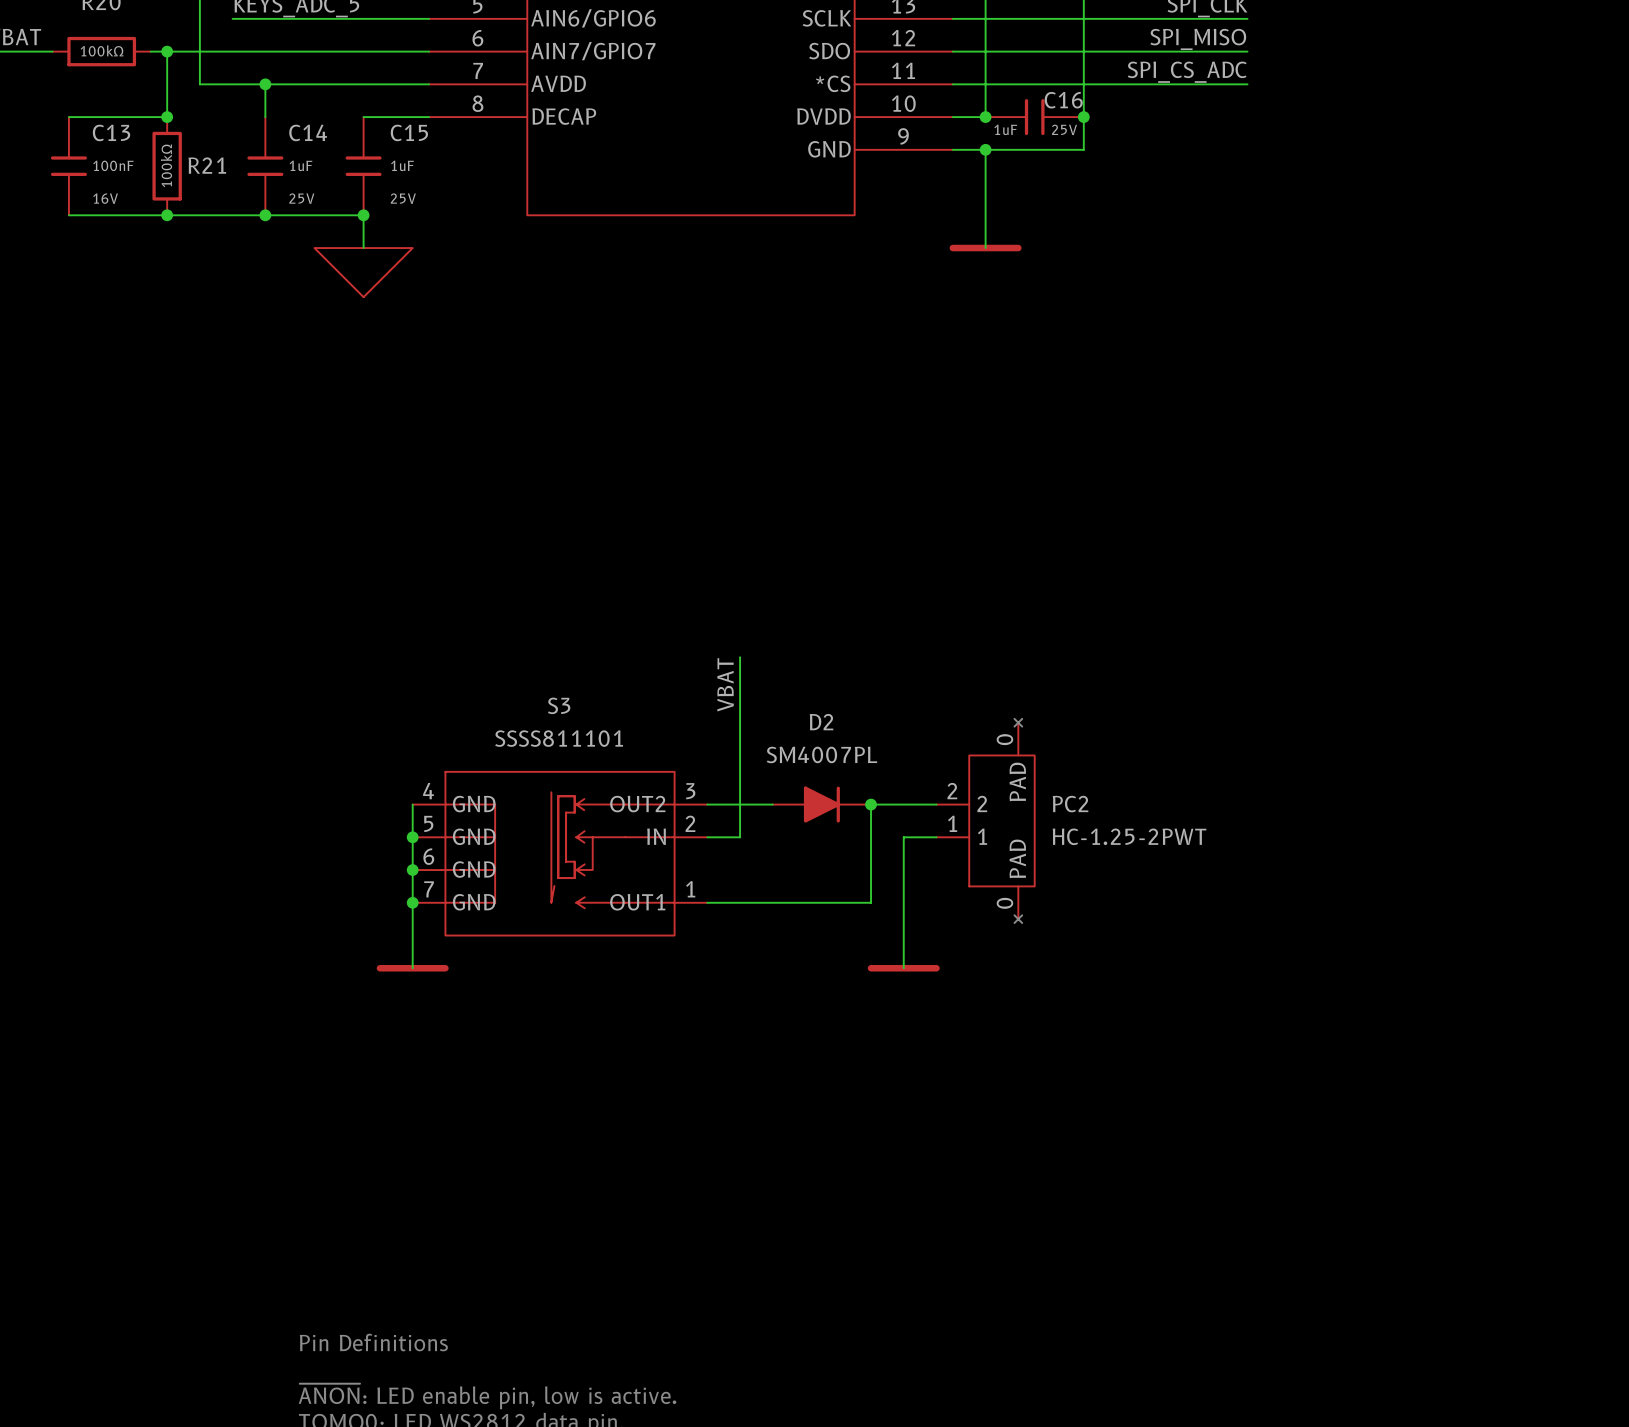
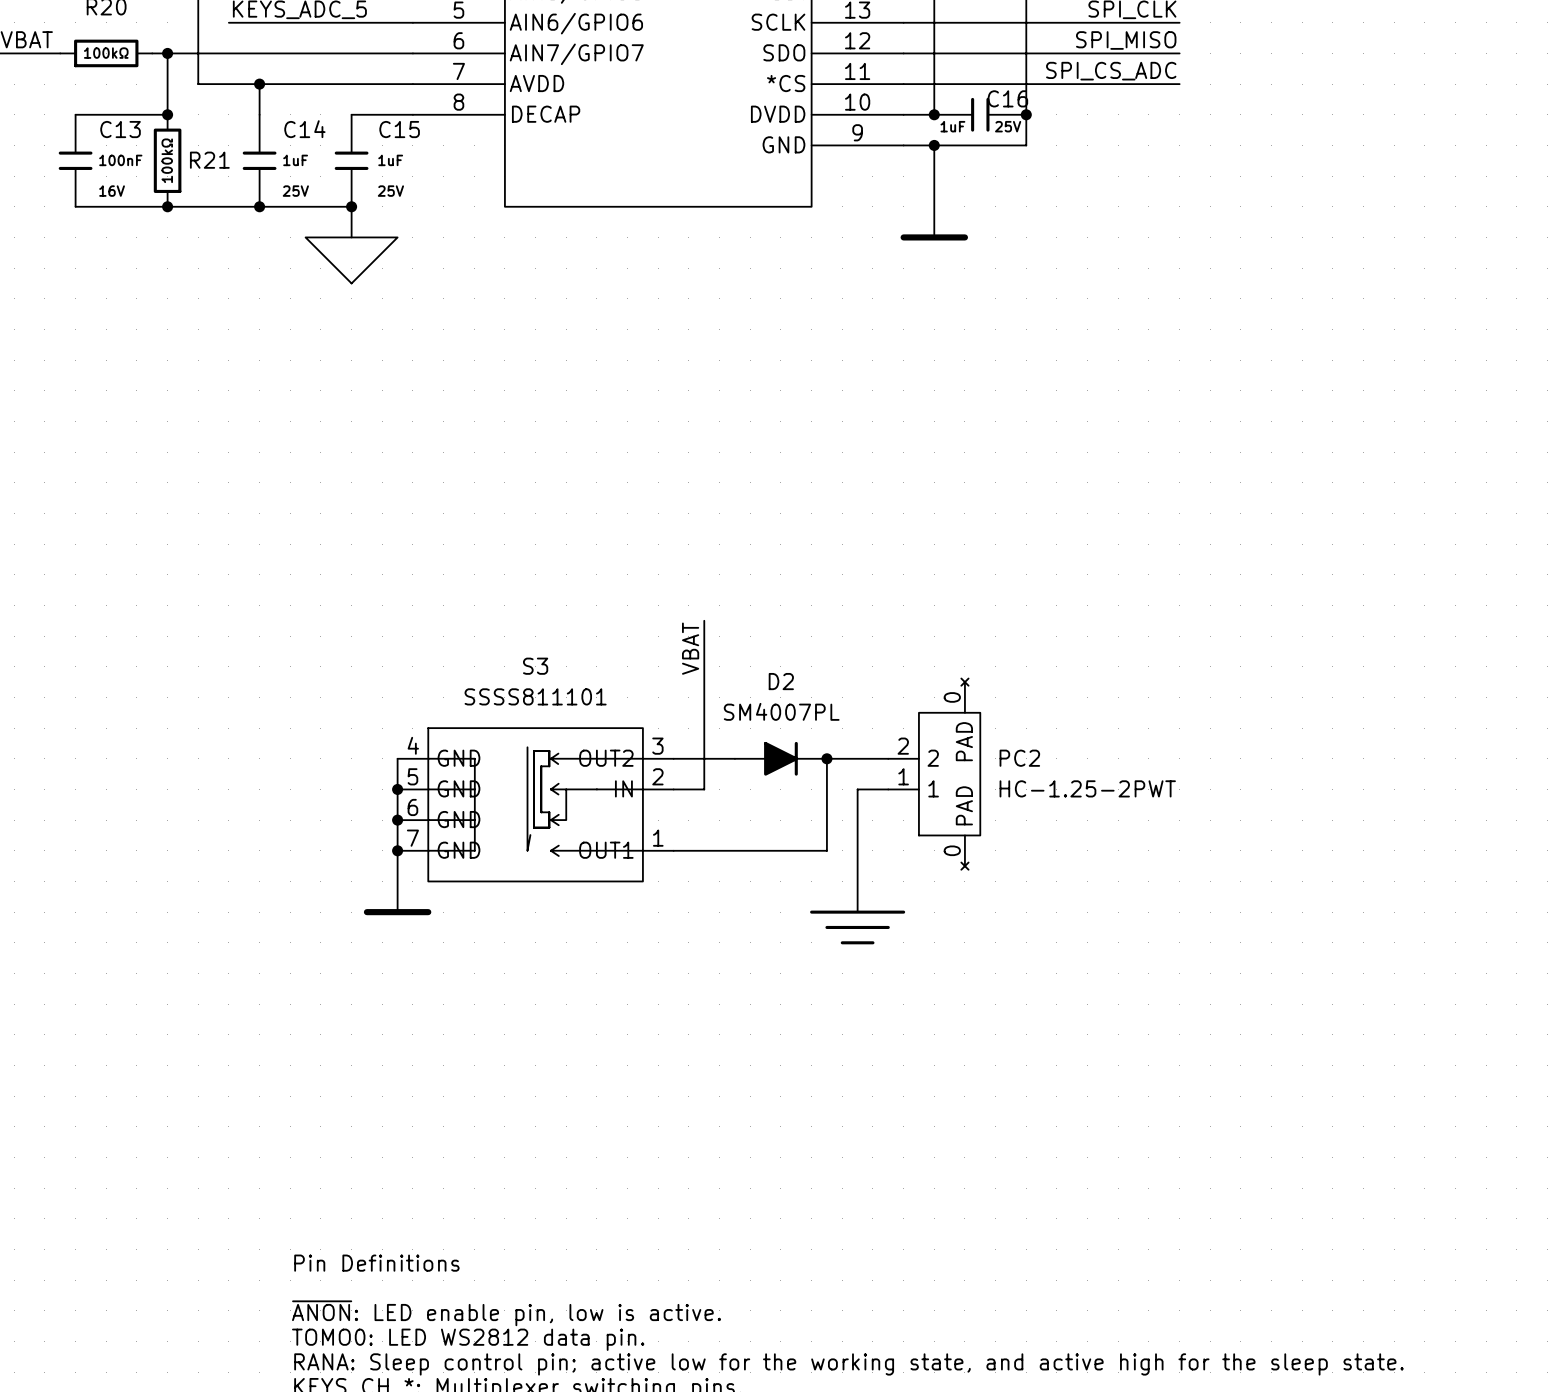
power symbol: (903, 968) -> none
power symbol: none -> (857, 927)

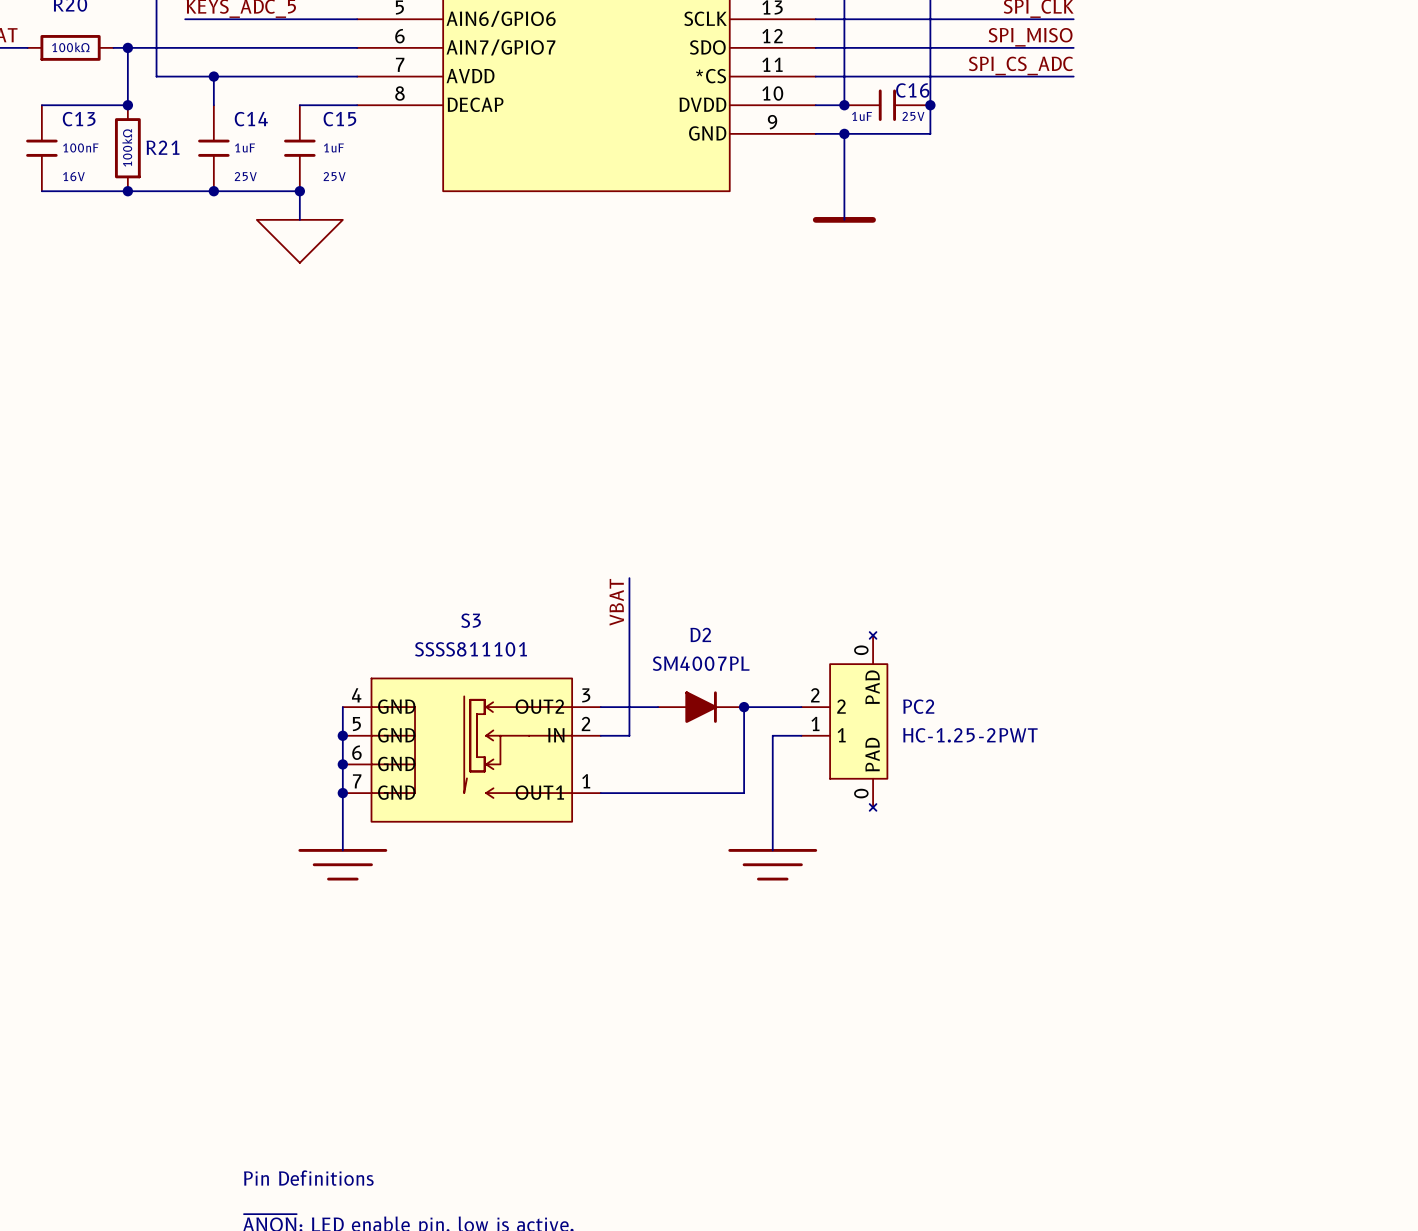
power symbol: (397, 912) -> none
power symbol: none -> (342, 864)

